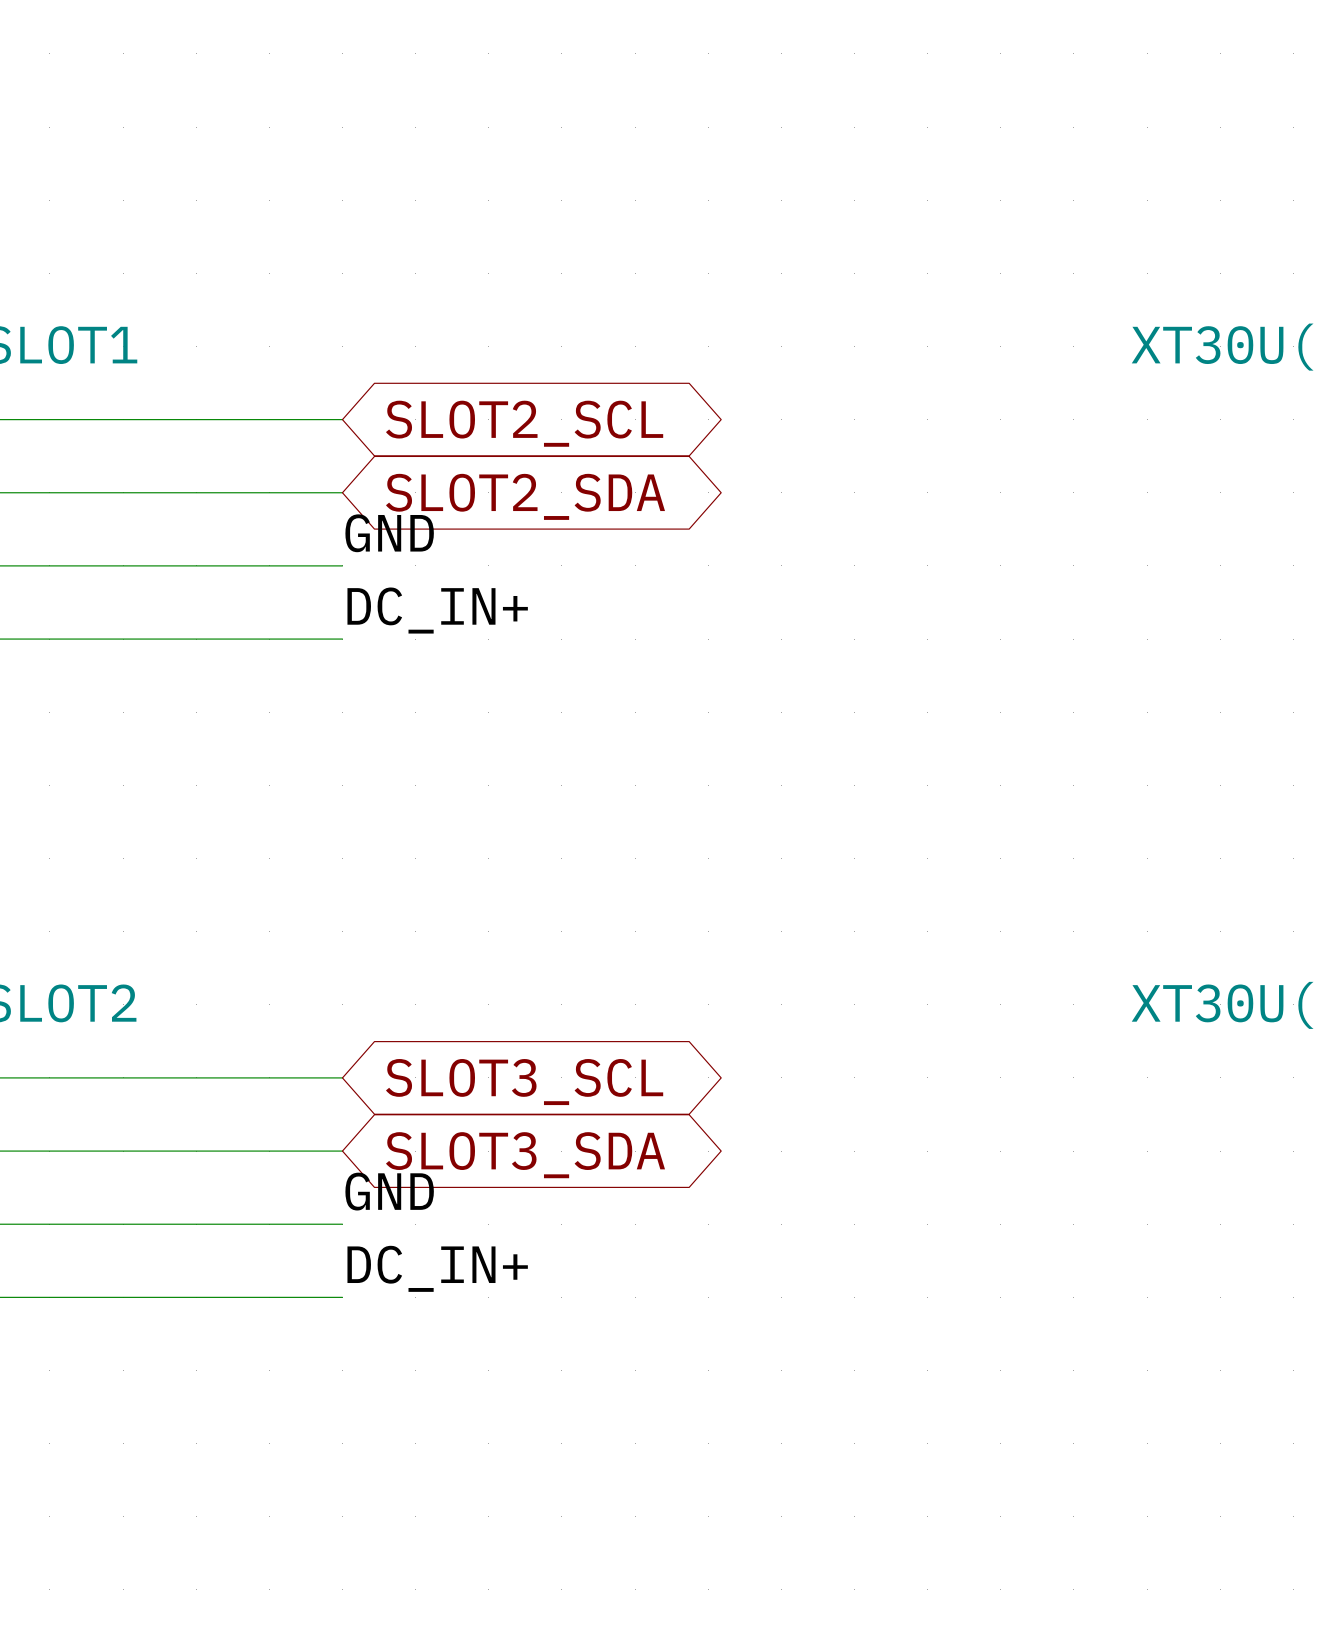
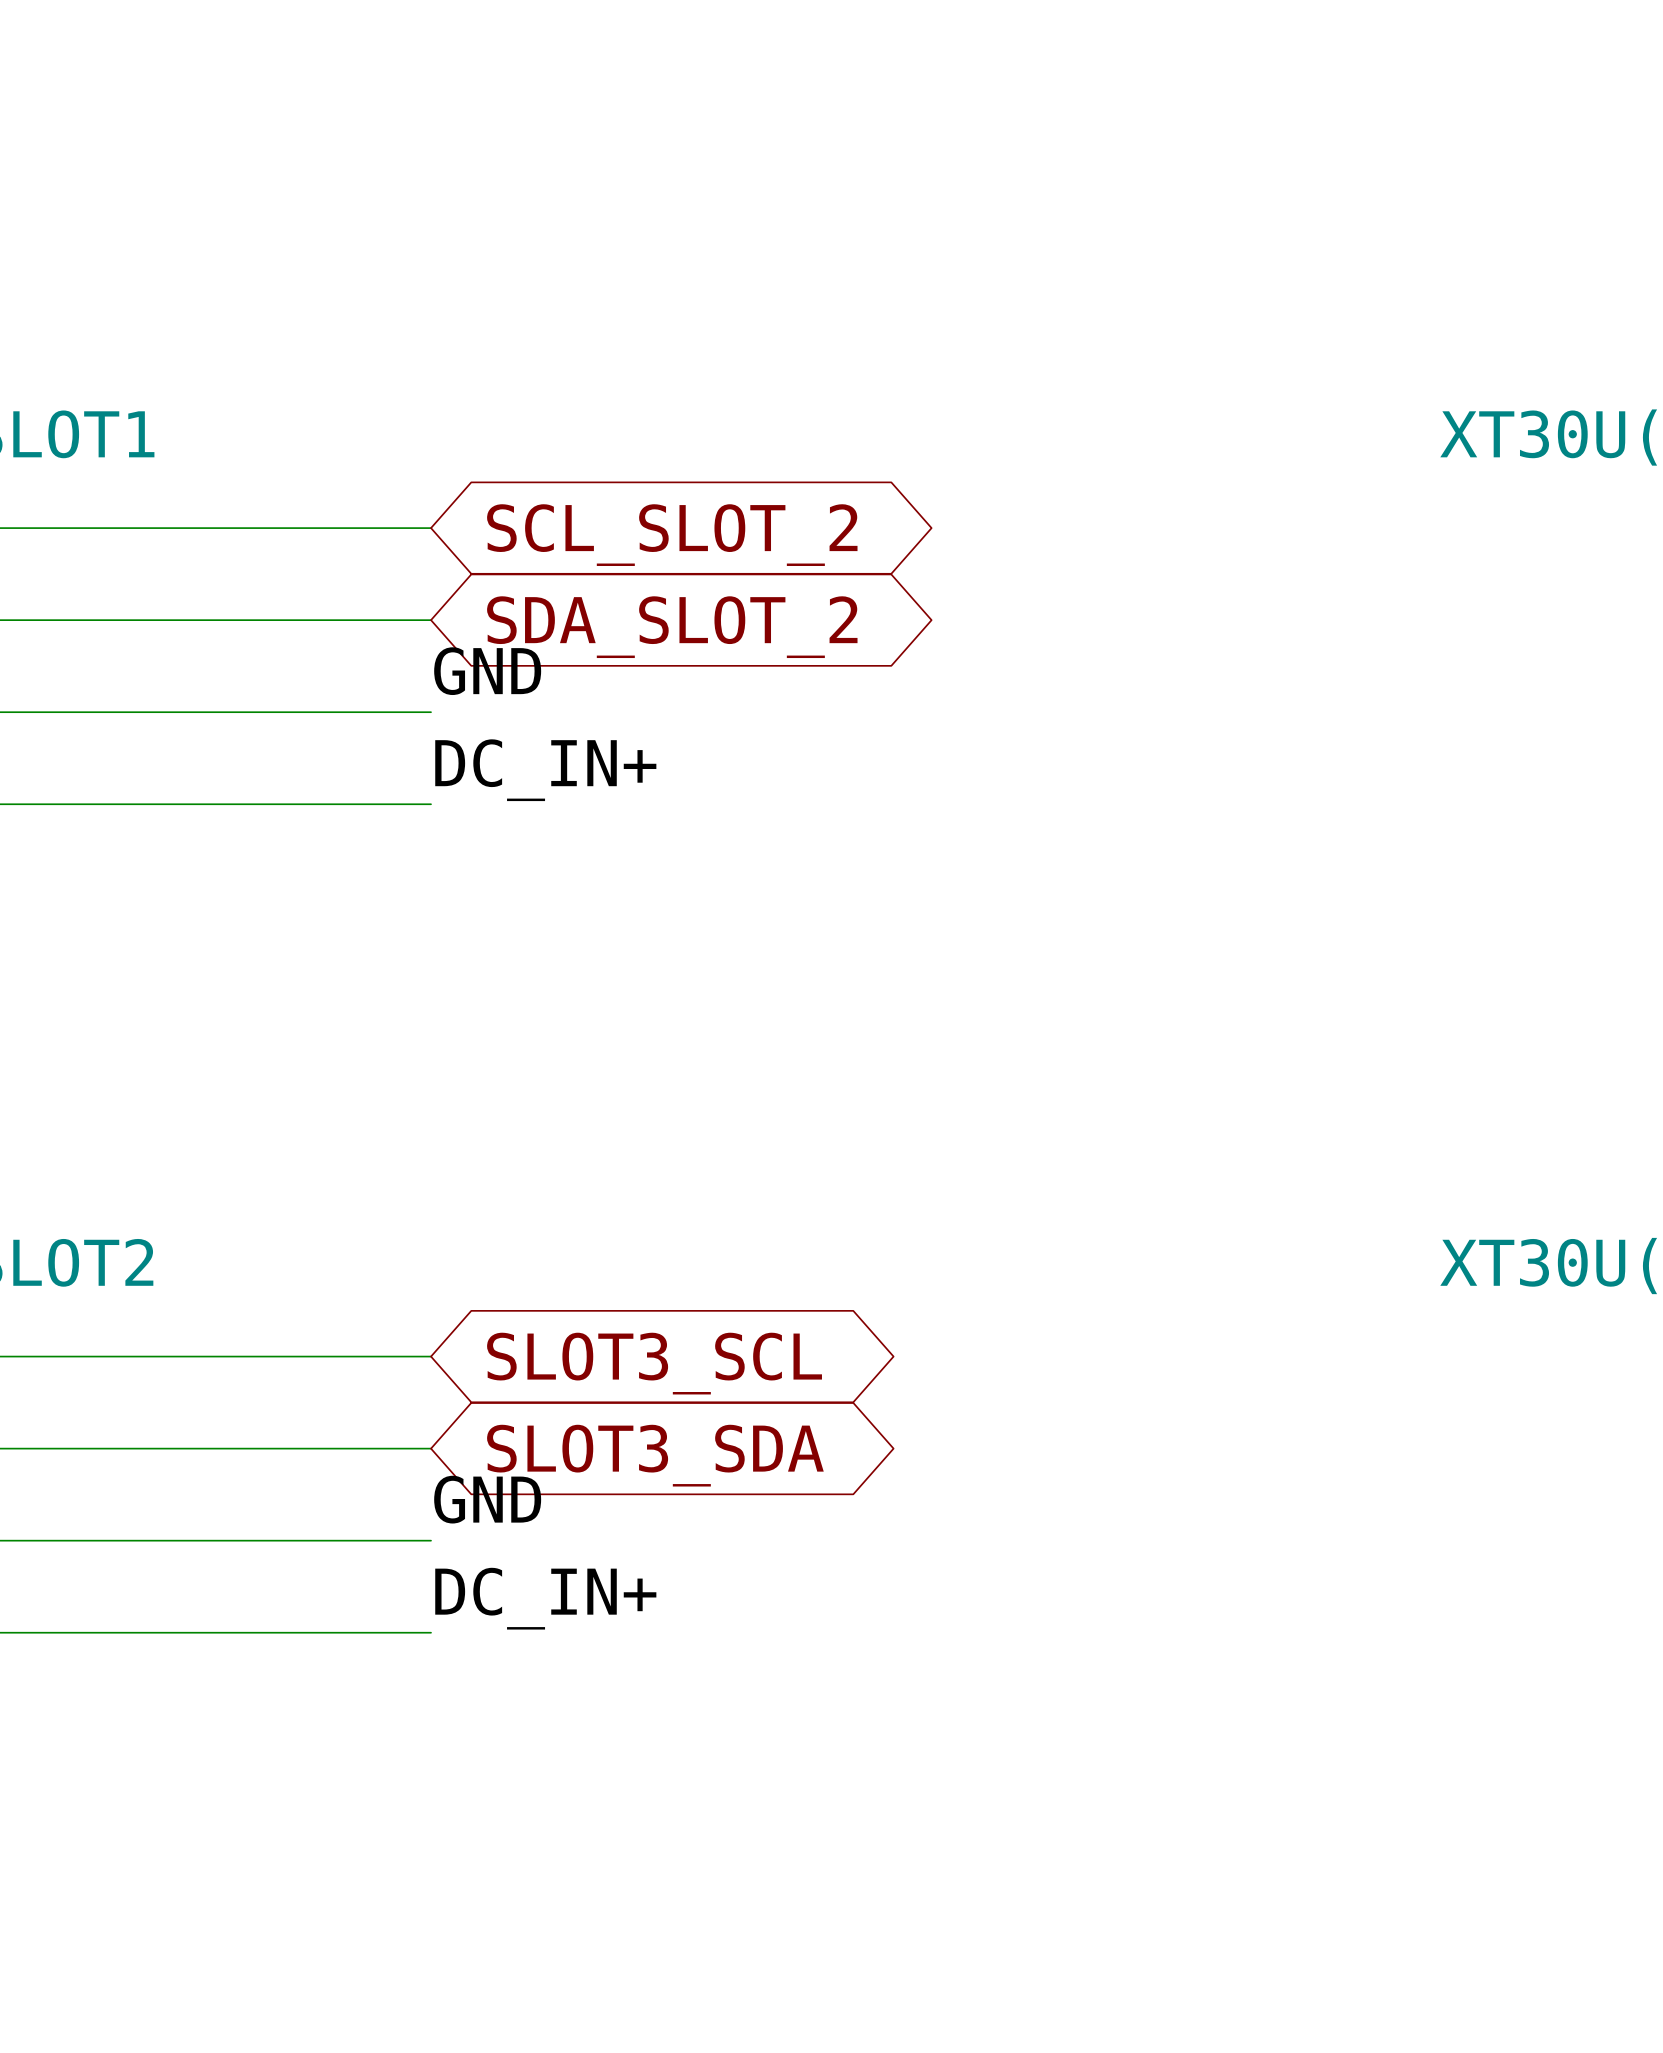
global label: SLOT2_SCL (524, 423) -> SCL_SLOT_2 (672, 535)
global label: SLOT2_SDA (525, 496) -> SDA_SLOT_2 (672, 627)

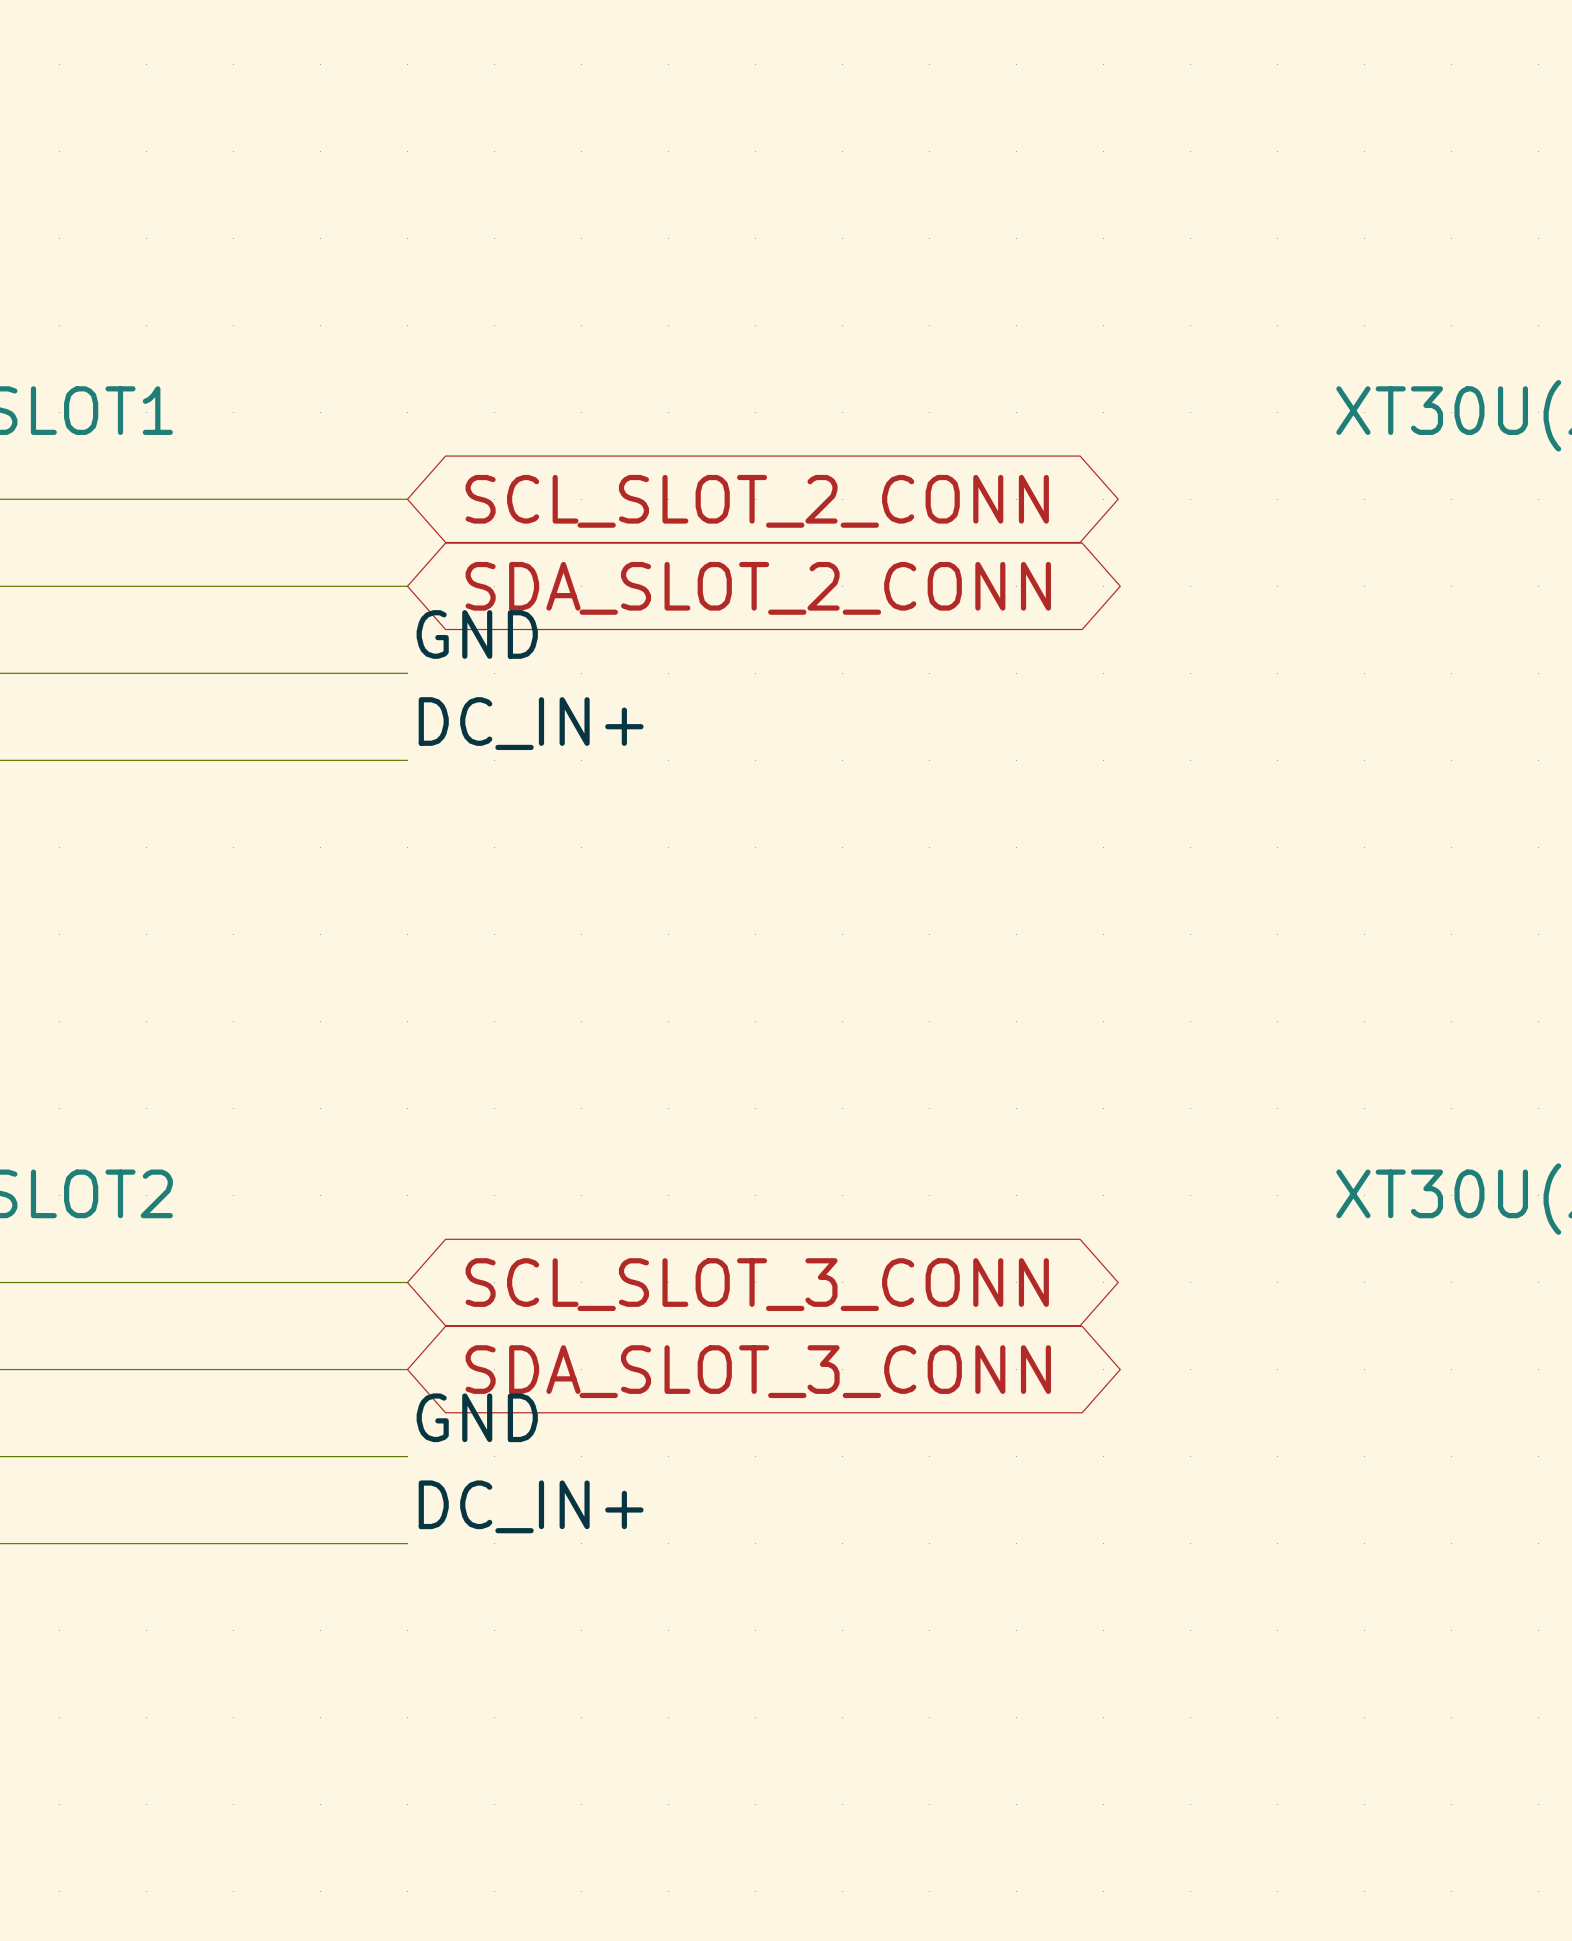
global label: SCL_SLOT_2 (672, 535) -> SCL_SLOT_2_CONN (757, 501)
global label: SDA_SLOT_2 (672, 627) -> SDA_SLOT_2_CONN (758, 588)
global label: SLOT3_SCL (654, 1363) -> SCL_SLOT_3_CONN (757, 1284)
global label: SLOT3_SDA (655, 1455) -> SDA_SLOT_3_CONN (758, 1371)

